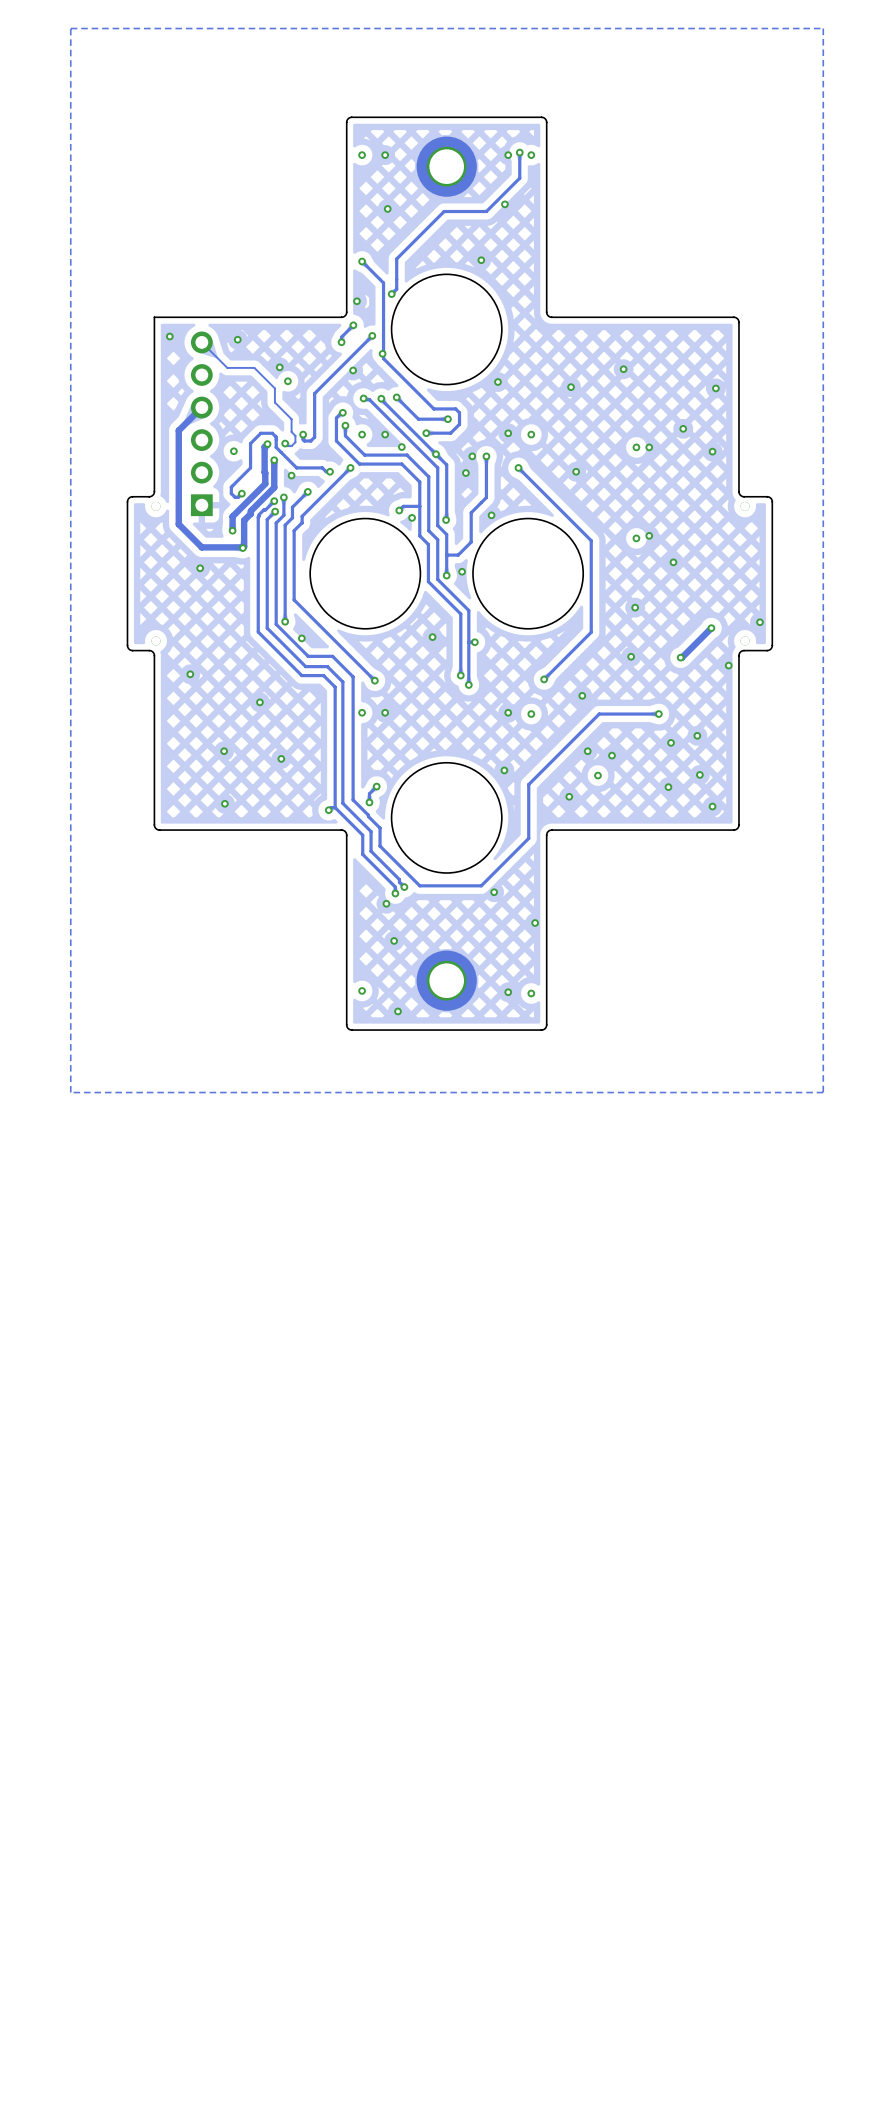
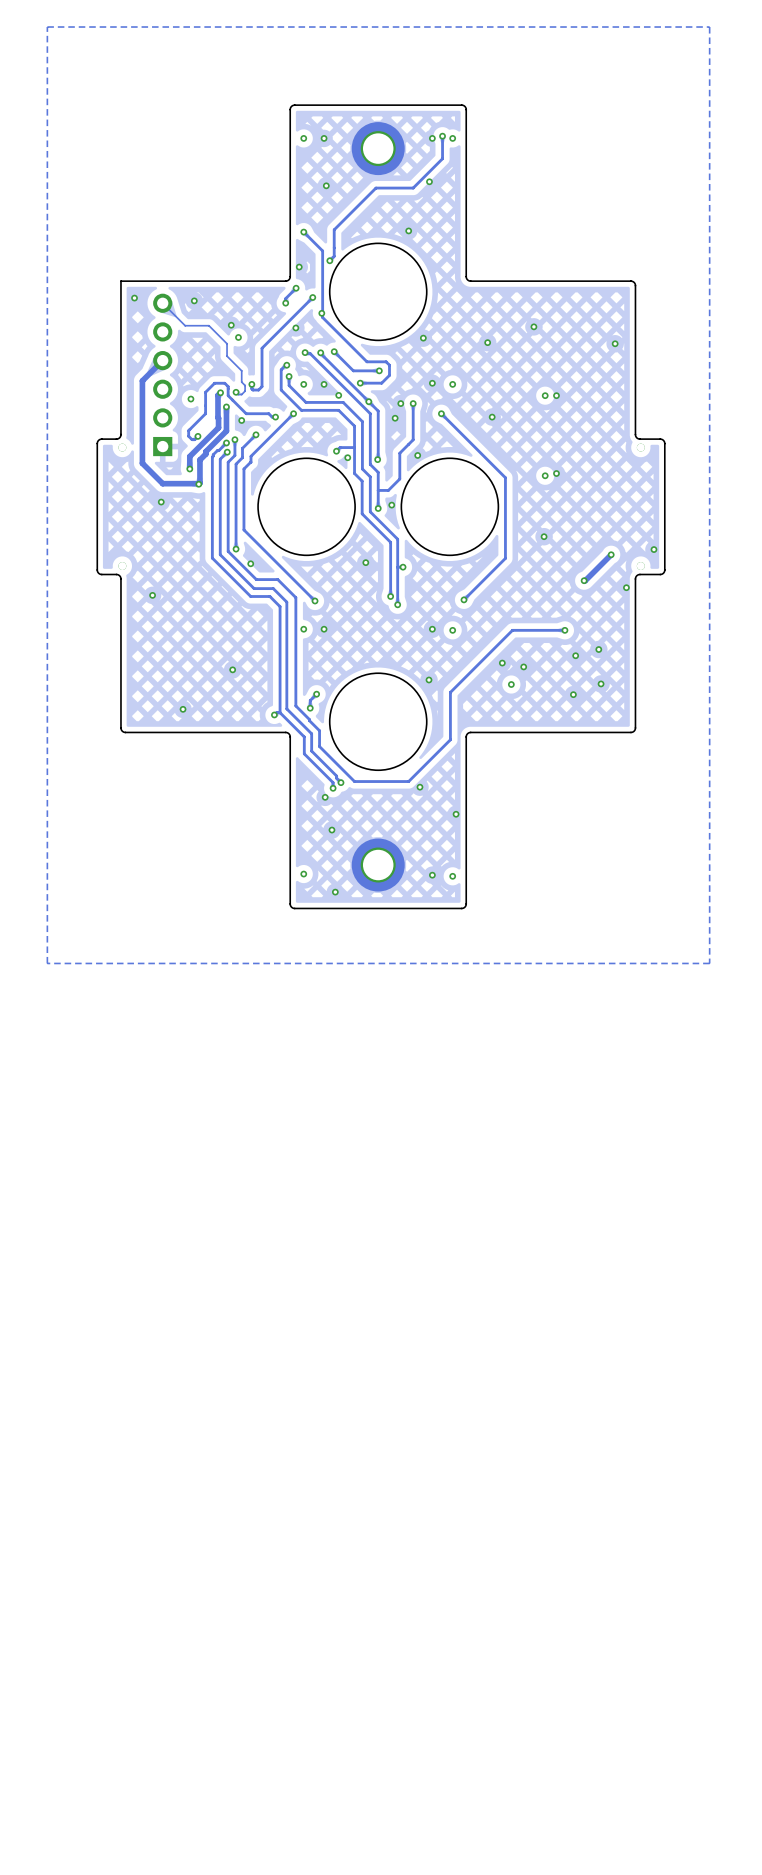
via: (683, 428) -> none
via: (712, 451) -> none
via: (673, 562) -> none
via: (631, 656) -> none
via: (582, 695) -> none
via: (259, 702) -> none
via: (224, 751) -> none
via: (569, 796) -> none
via: (712, 806) -> none

